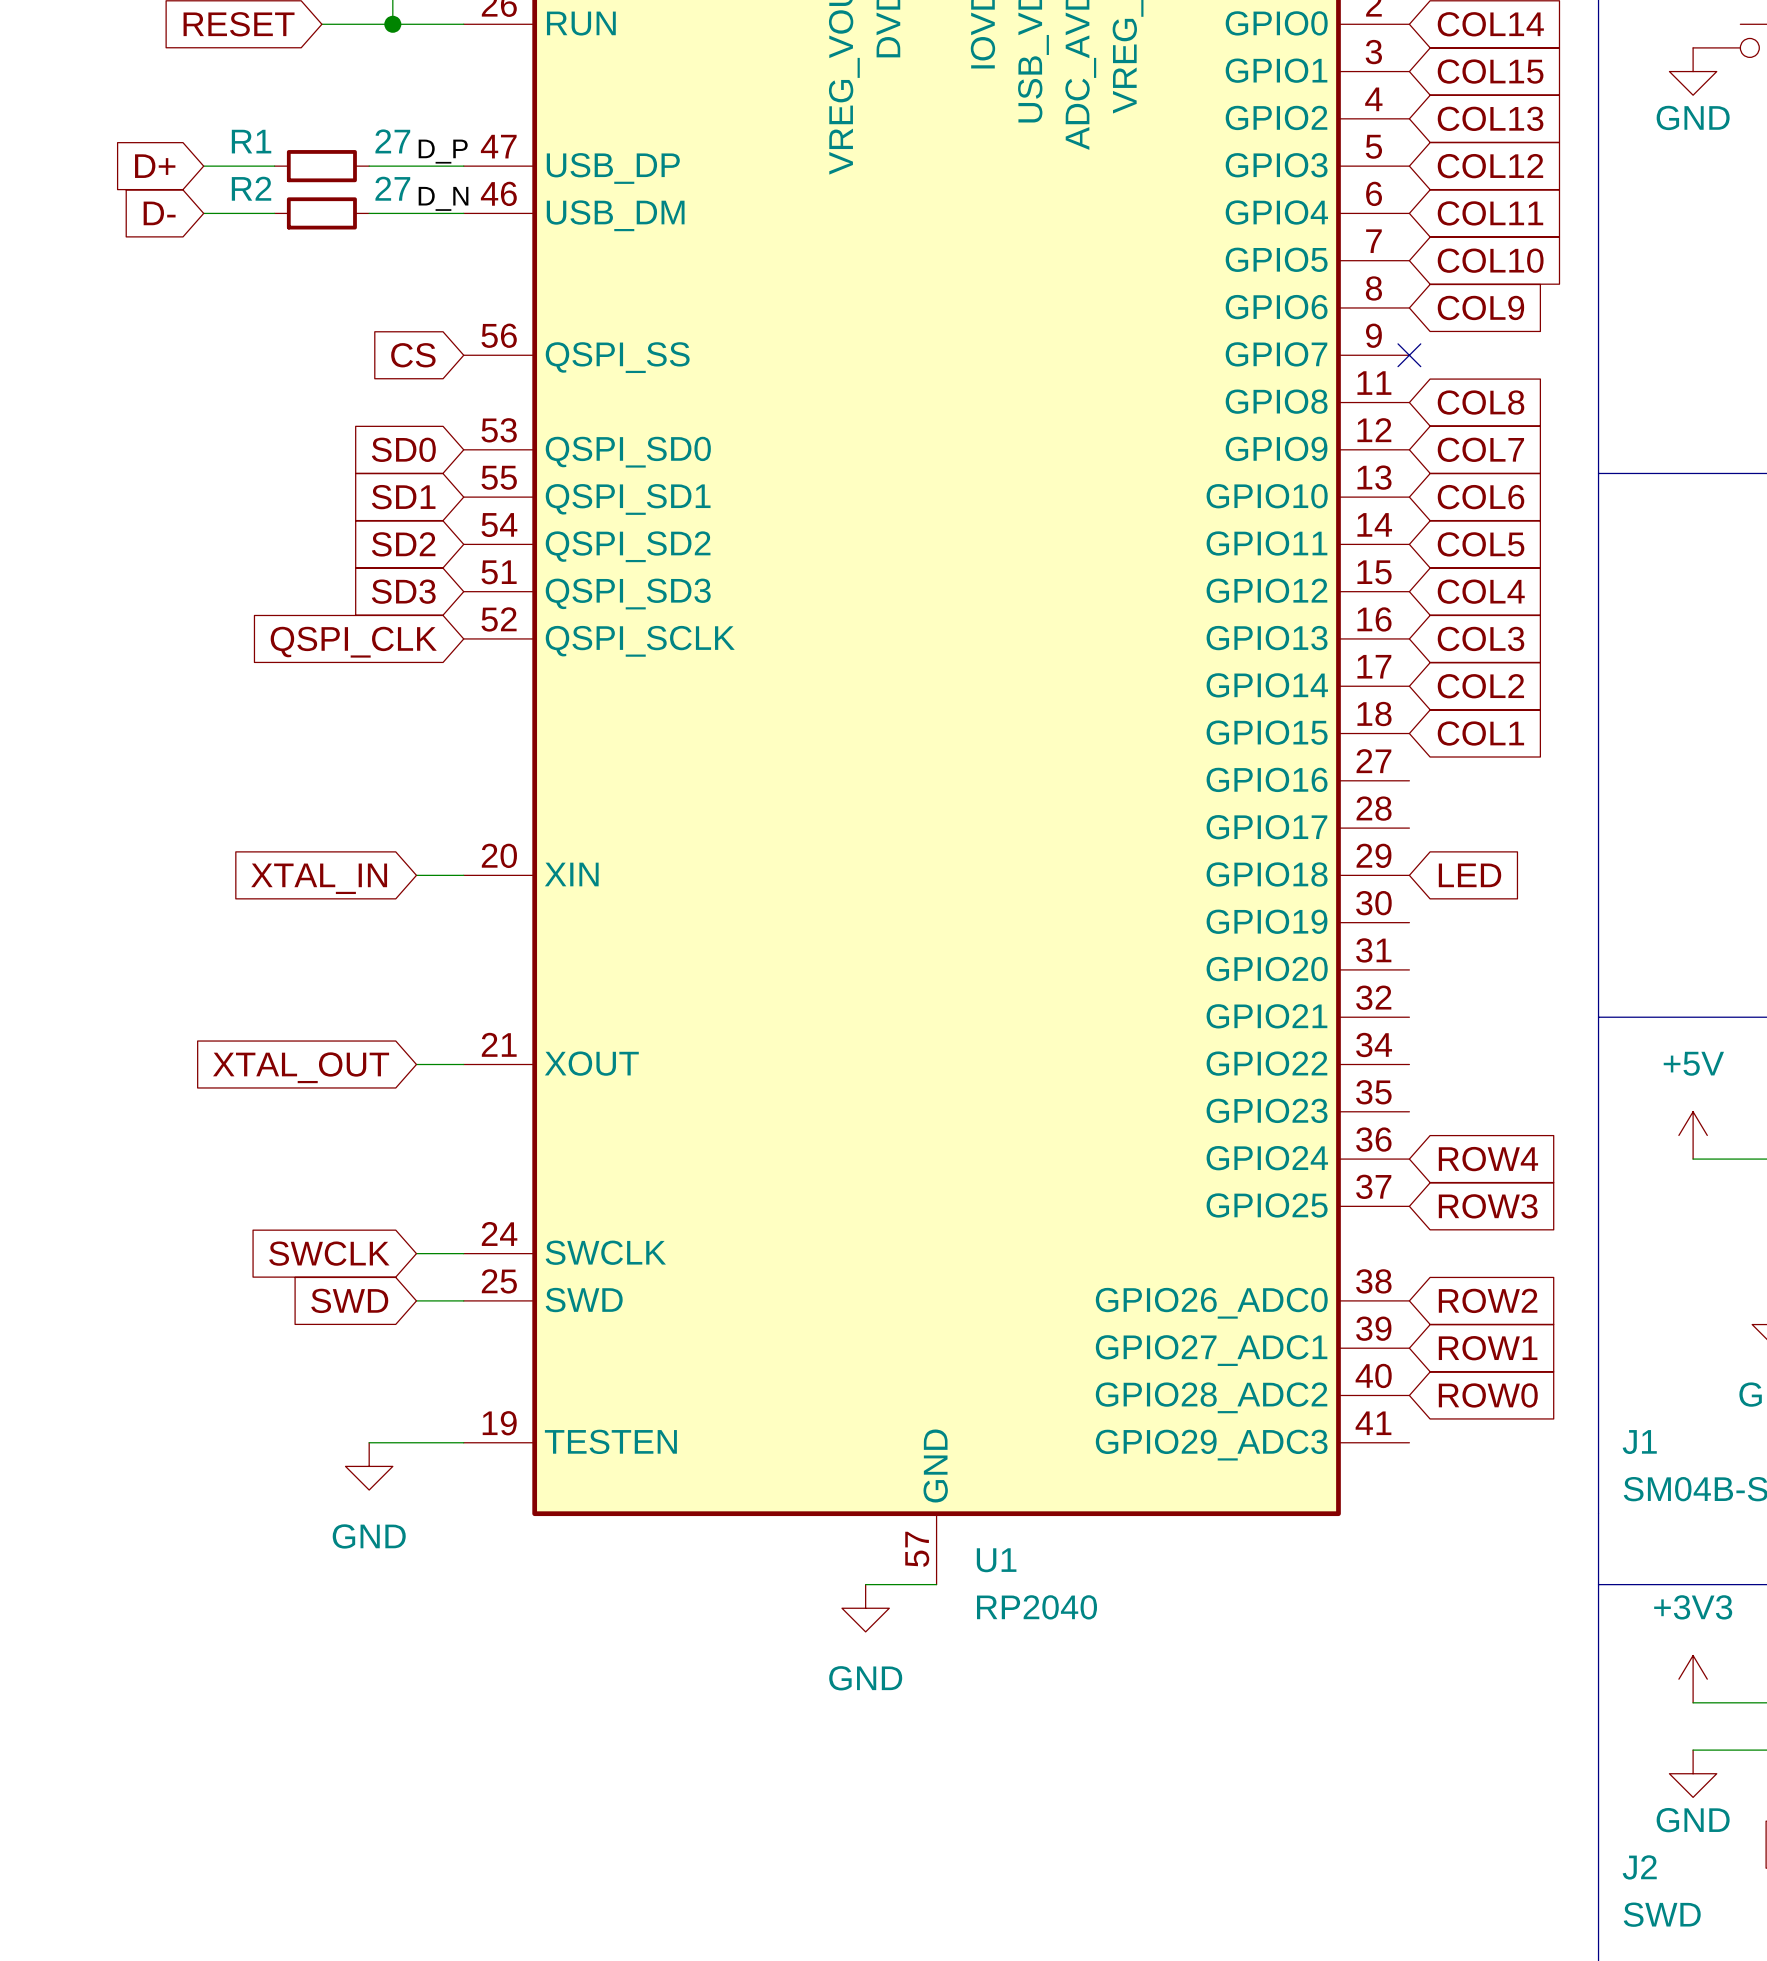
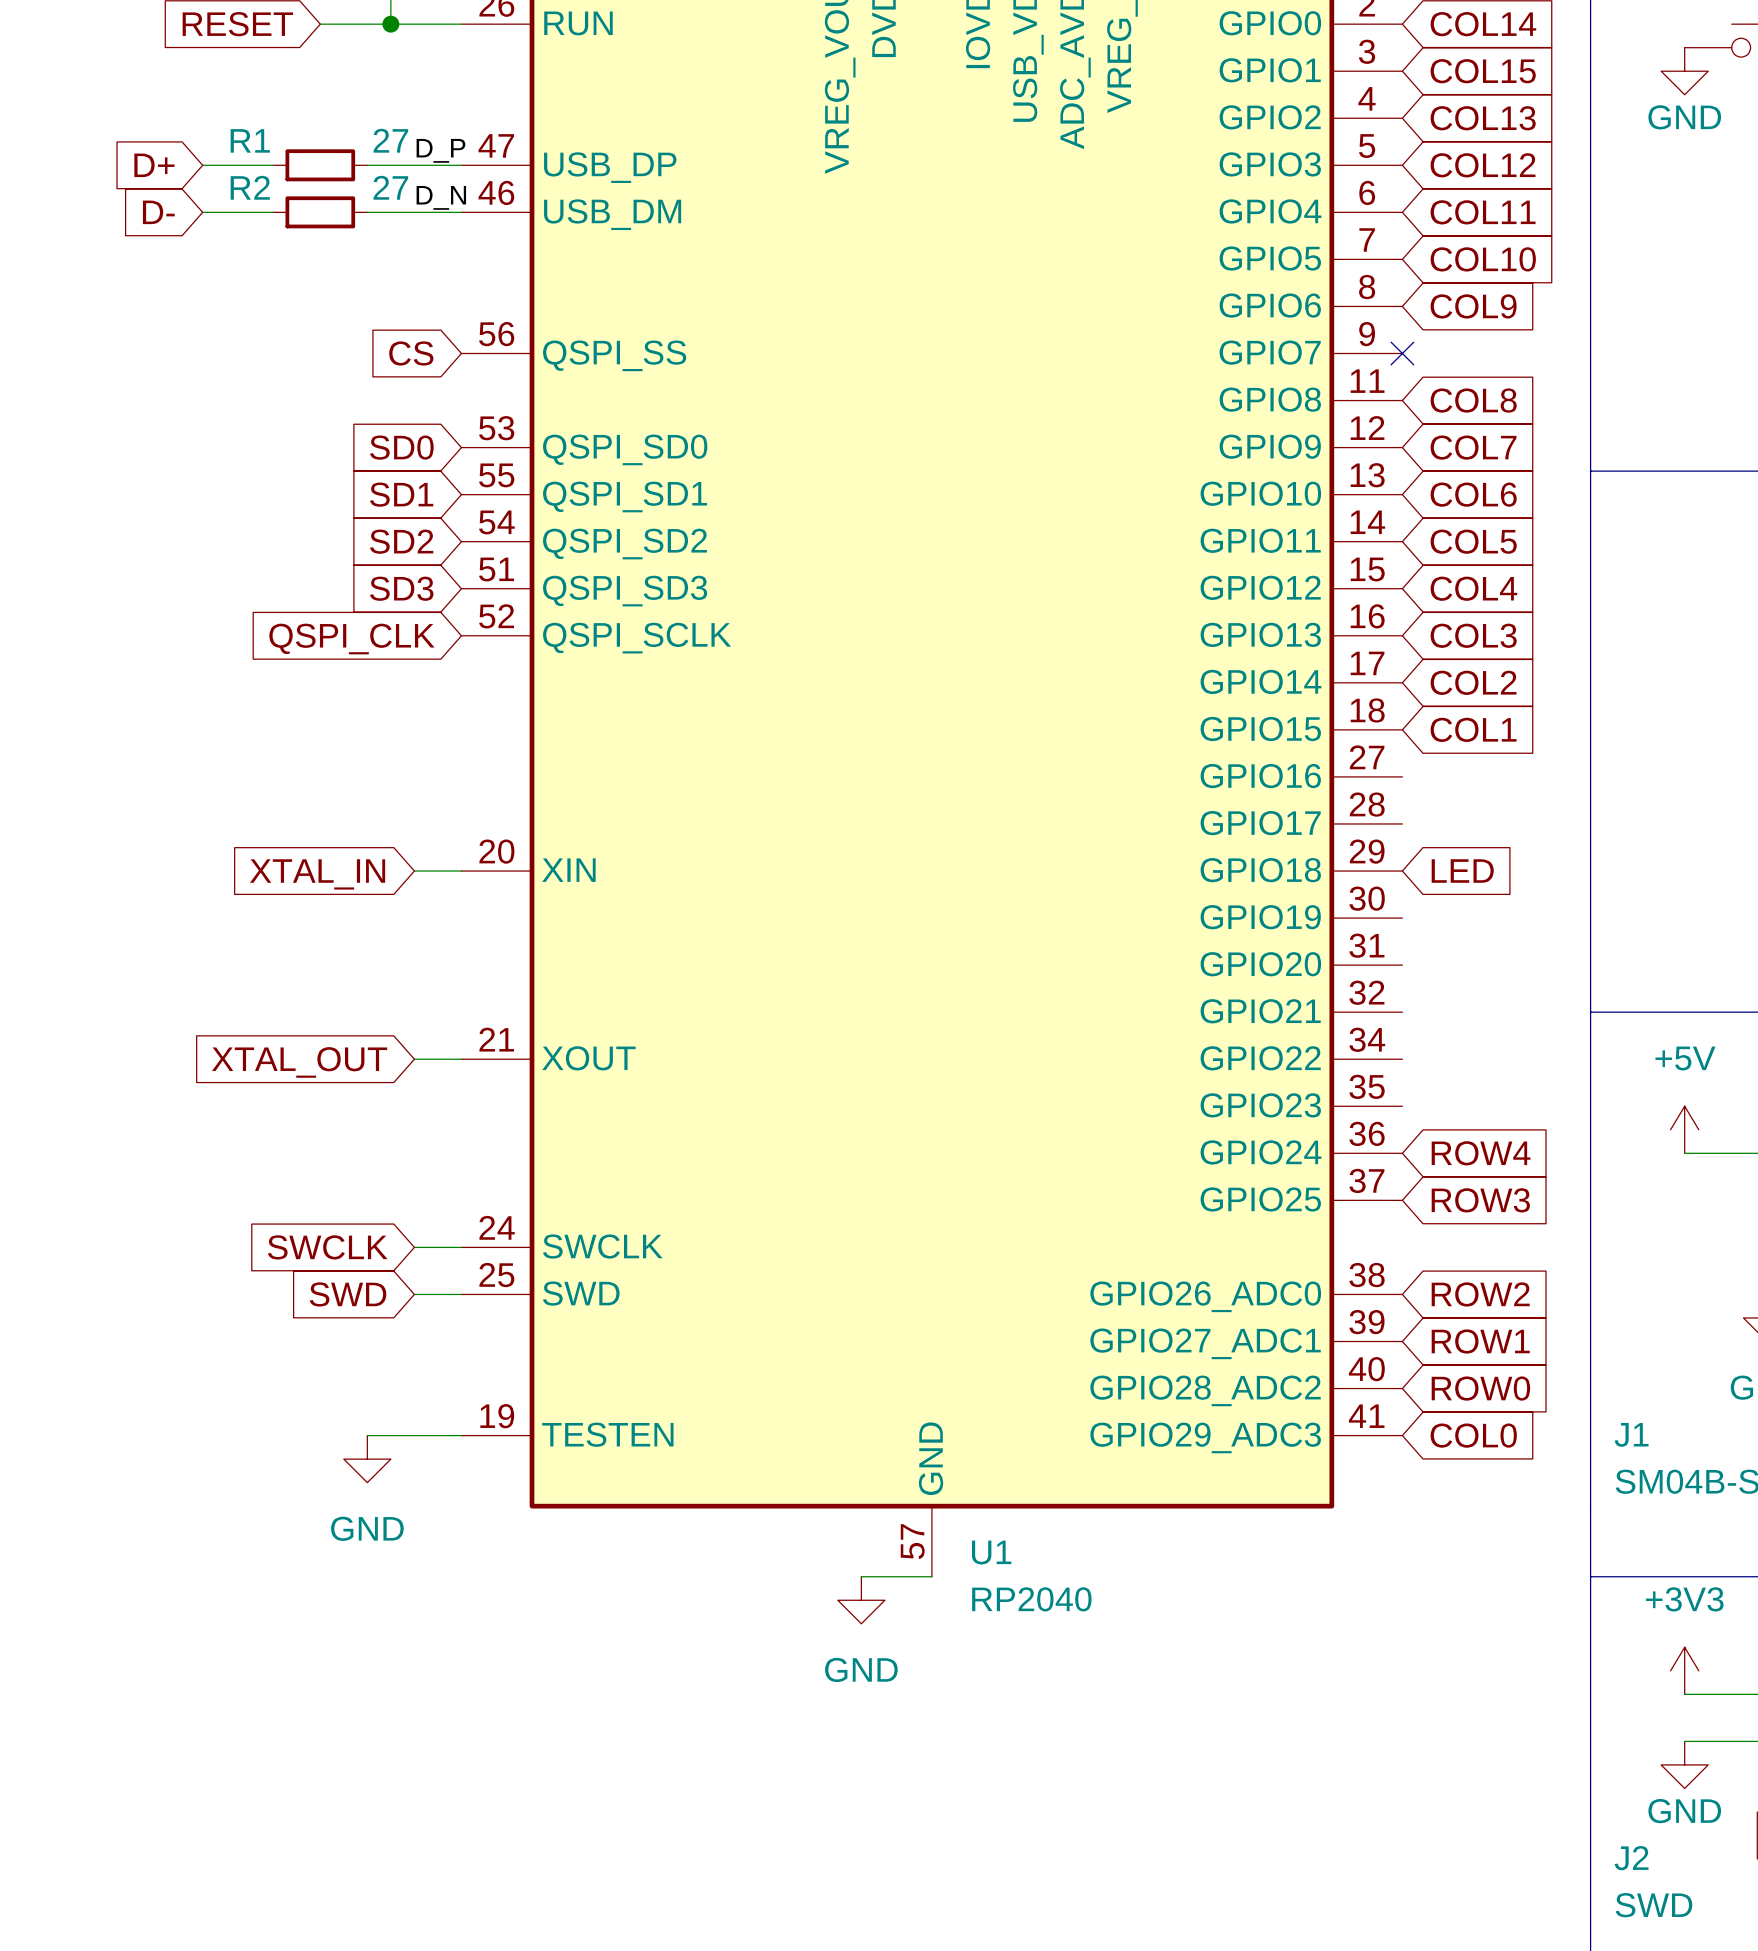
global label: none -> COL0 (1473, 1435)

